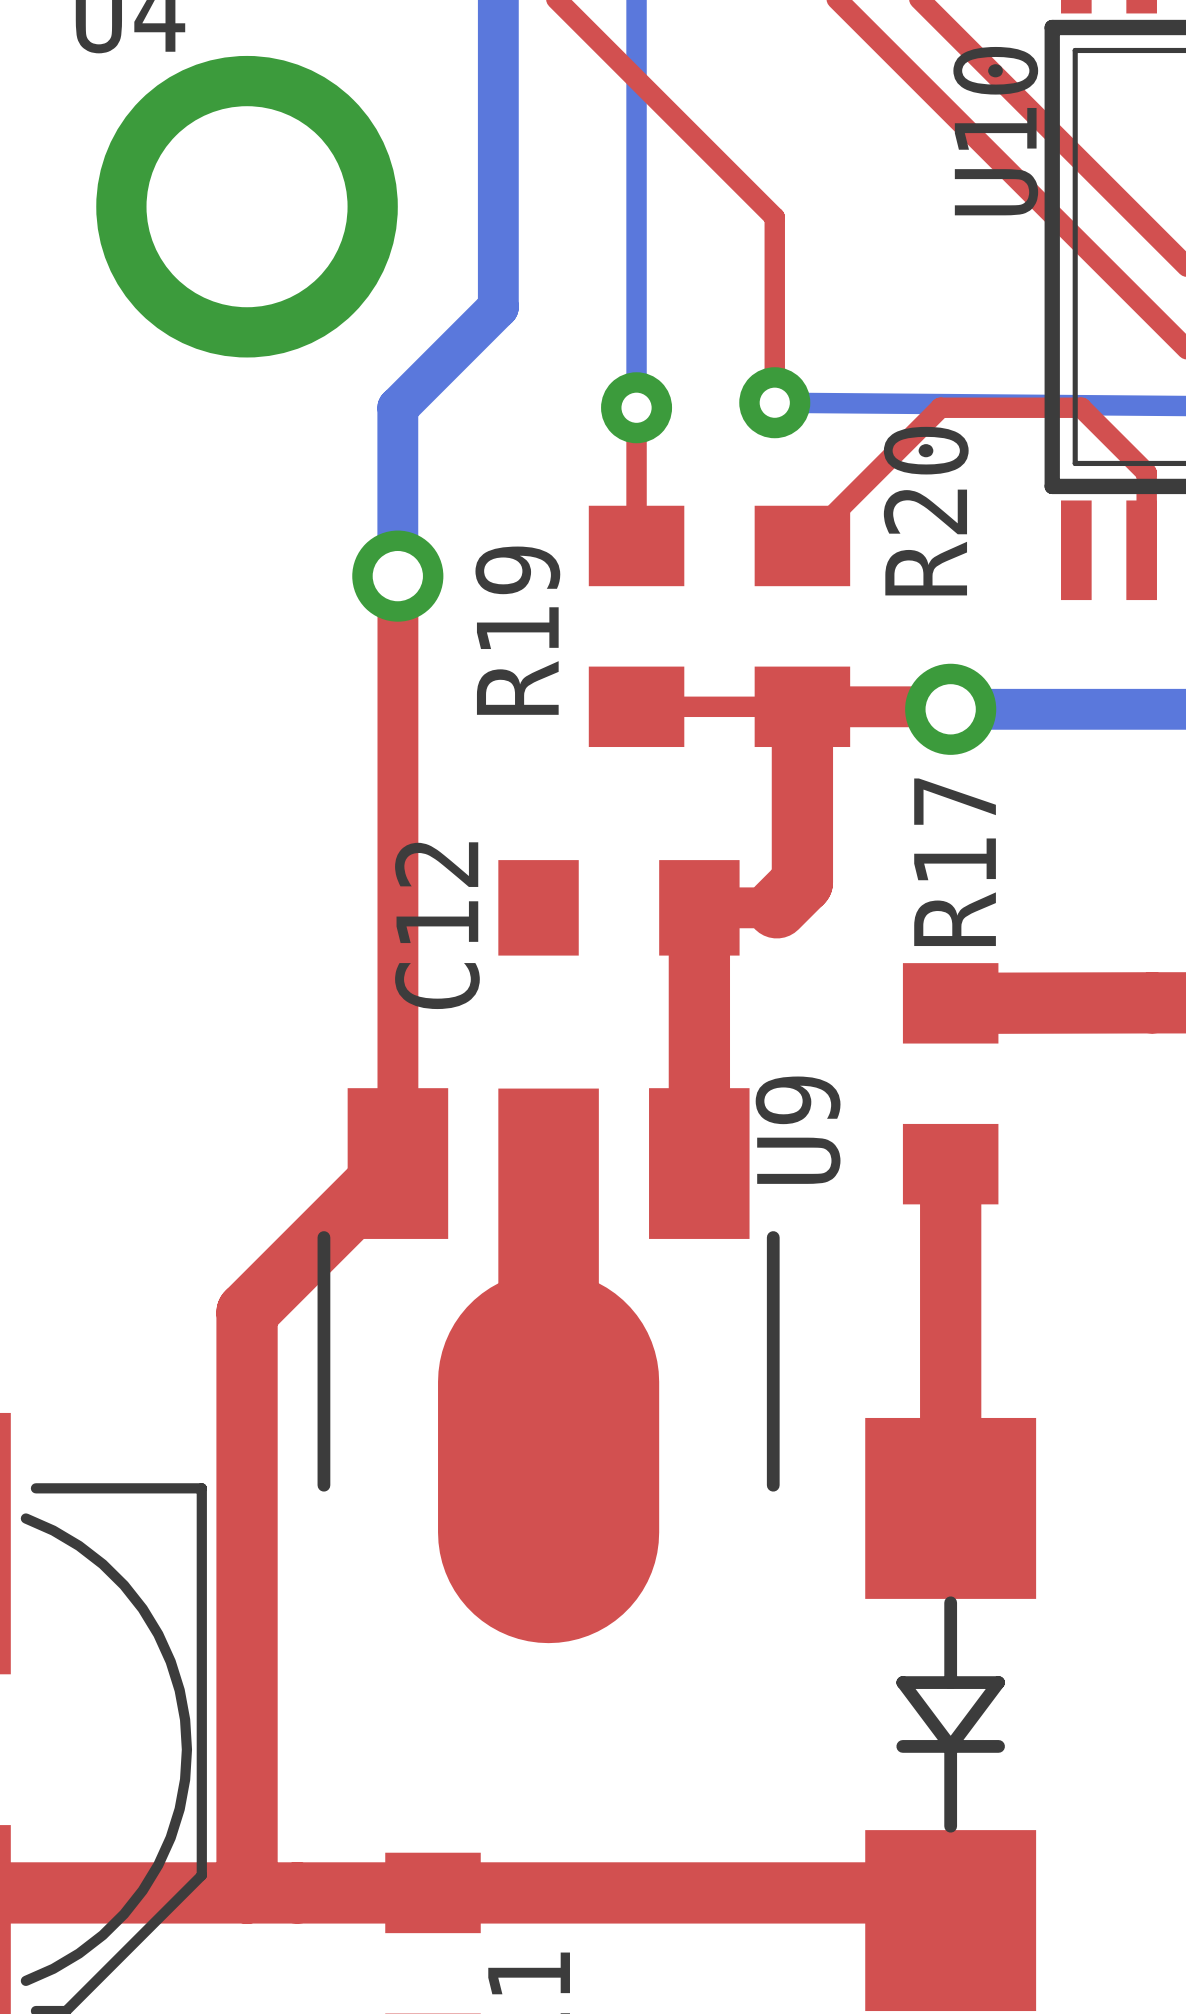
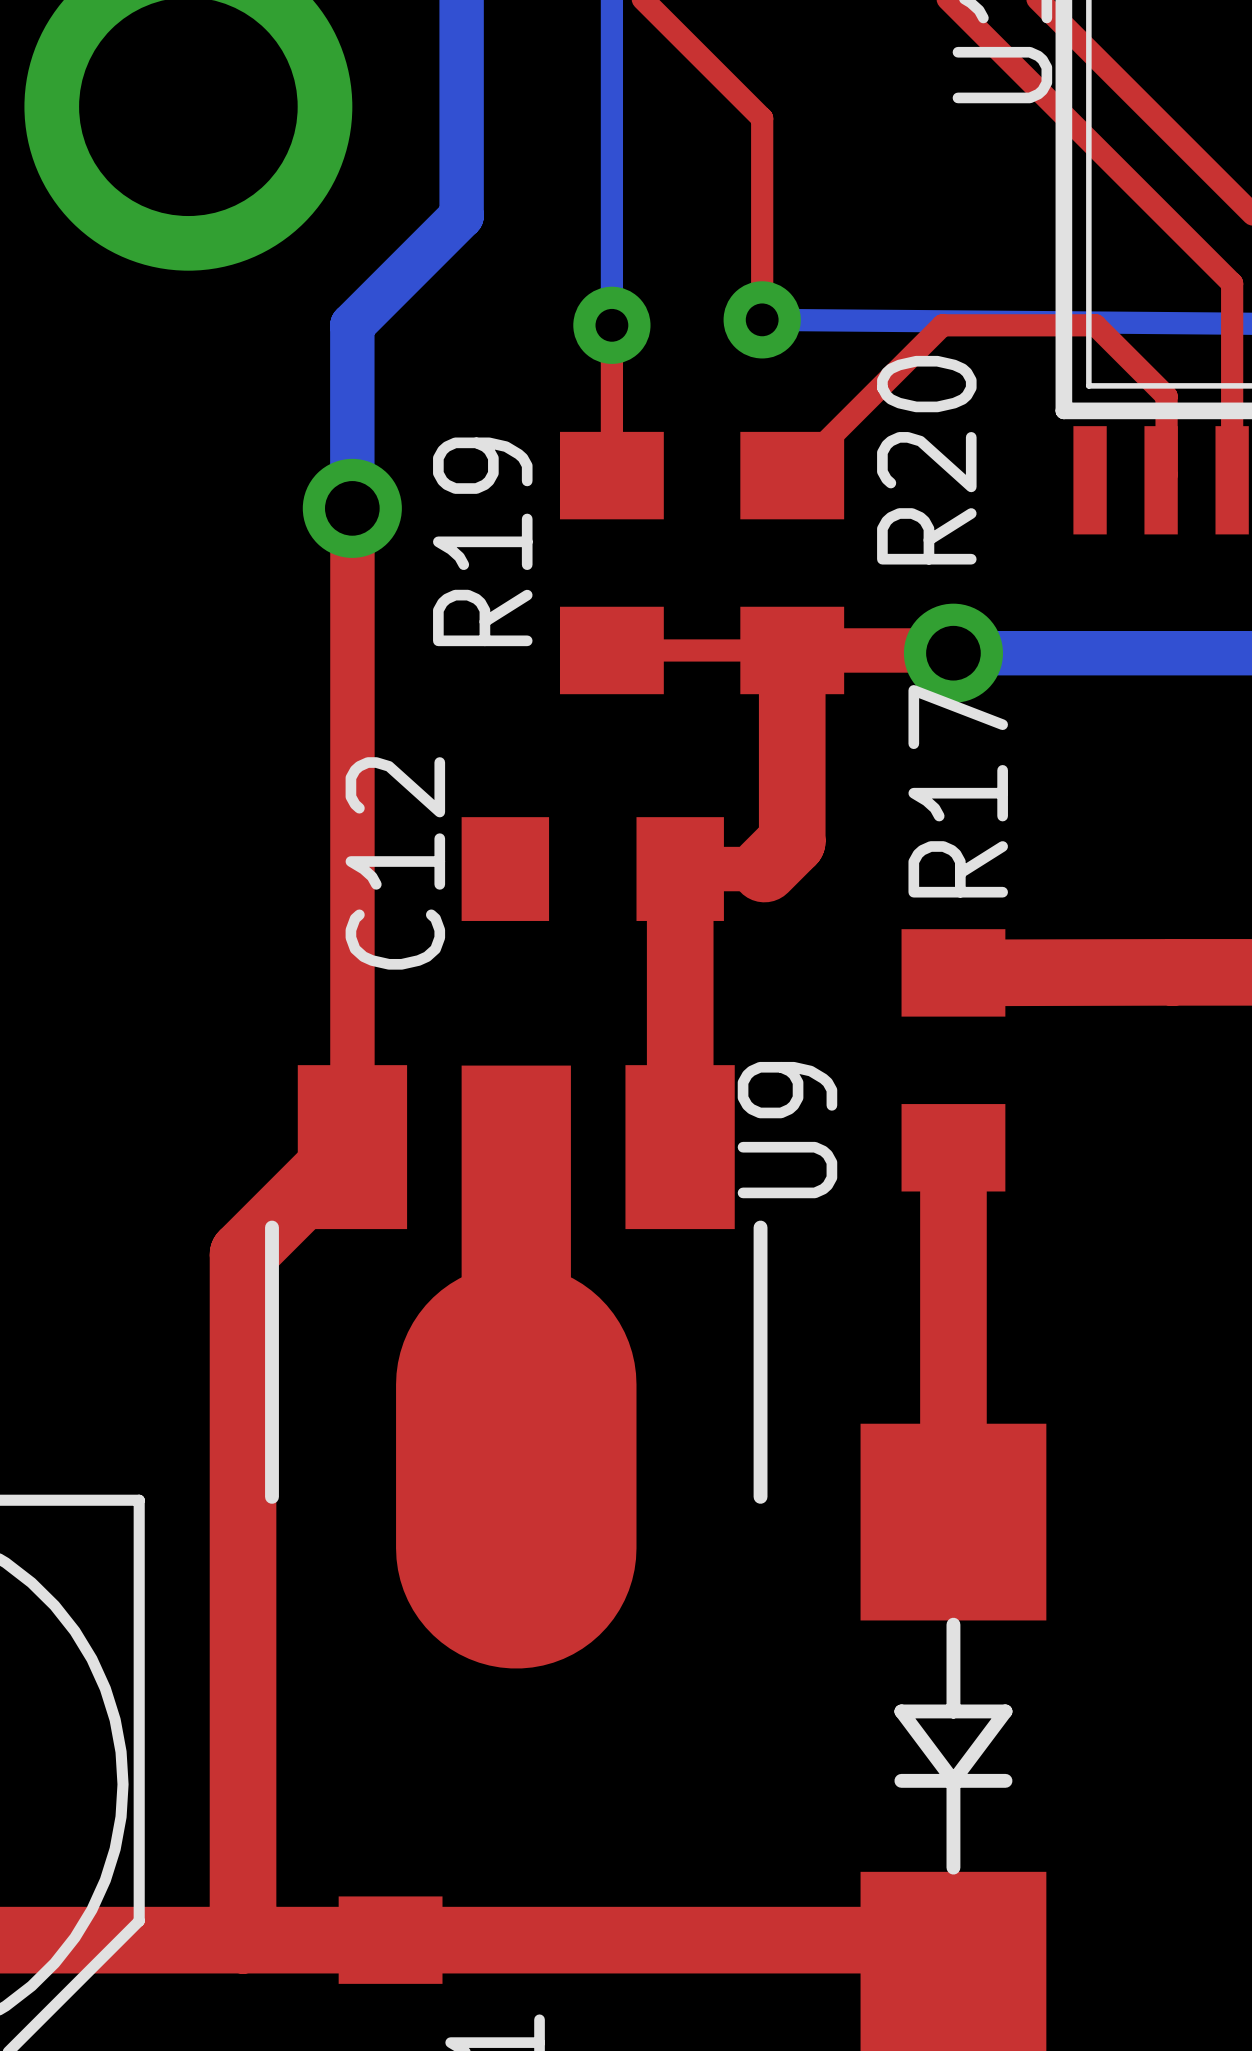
top track: (297, 1262) (247, 1312) (247, 1892) -> (243, 1254) (243, 1940)

